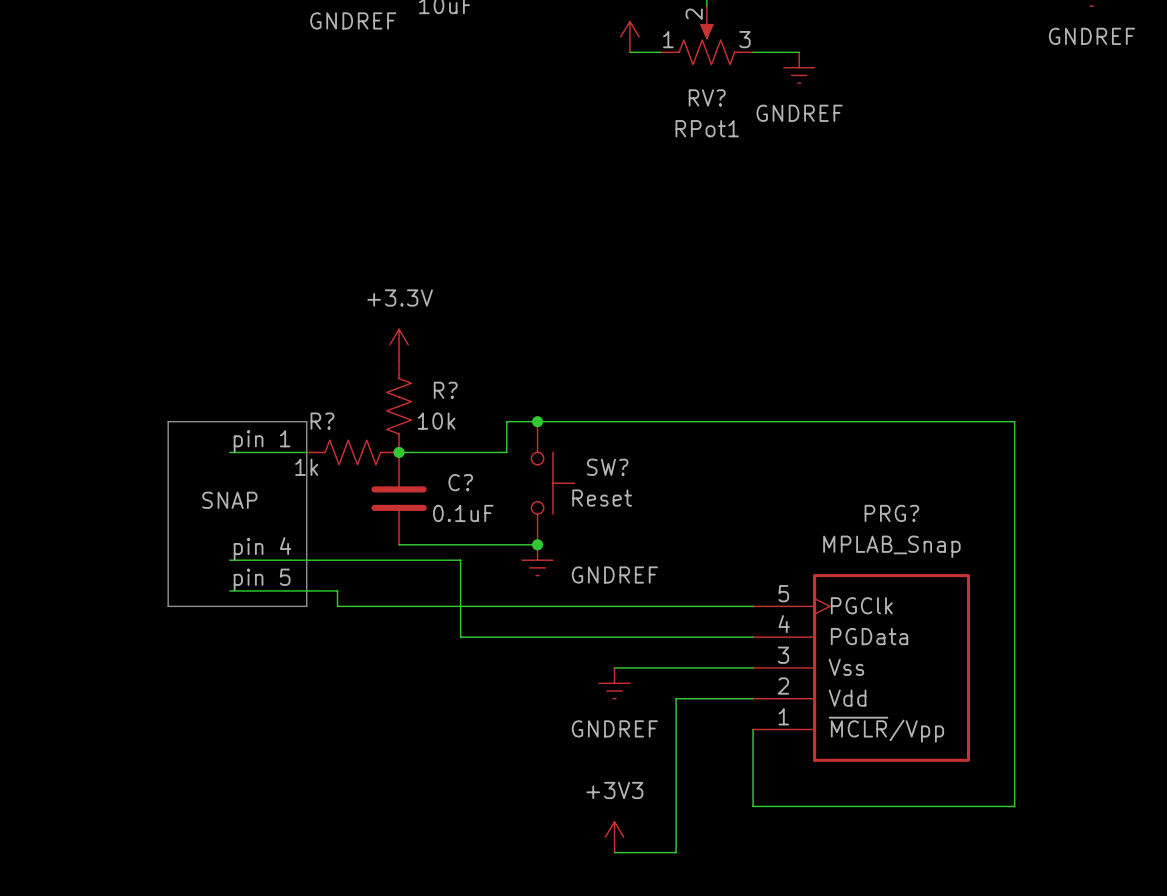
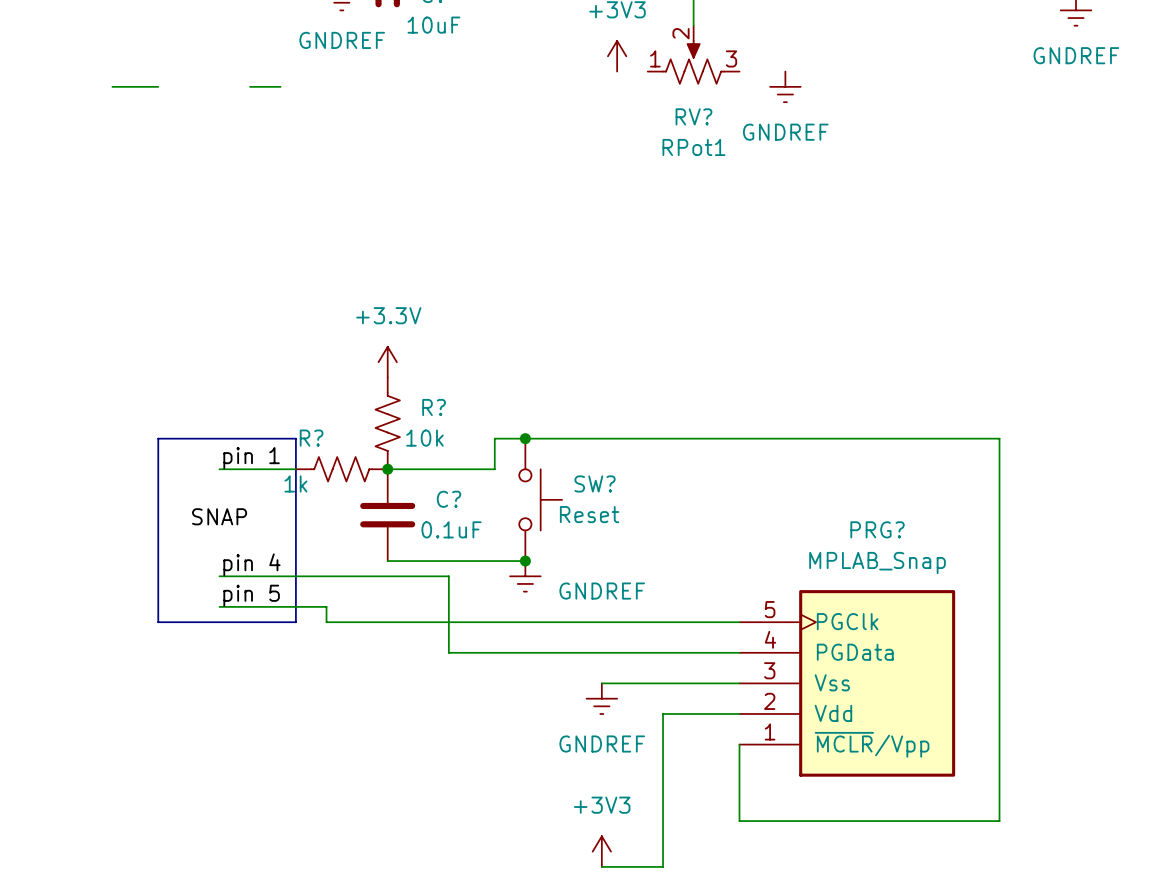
wire: (629, 52) (660, 52) -> none
wire: (753, 52) (799, 52) -> none
wire: none -> (112, 86) (158, 86)
wire: none -> (250, 86) (280, 86)

